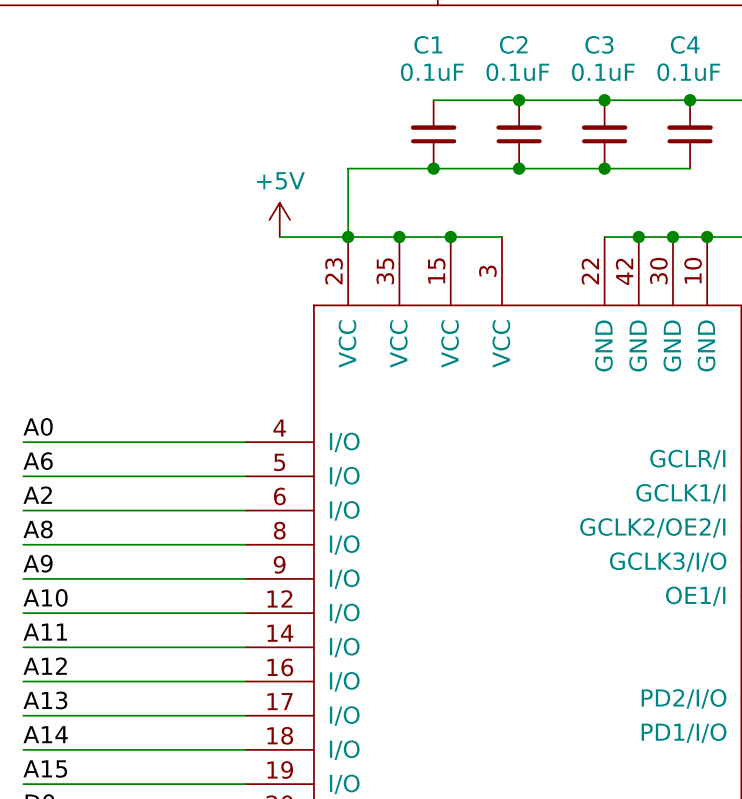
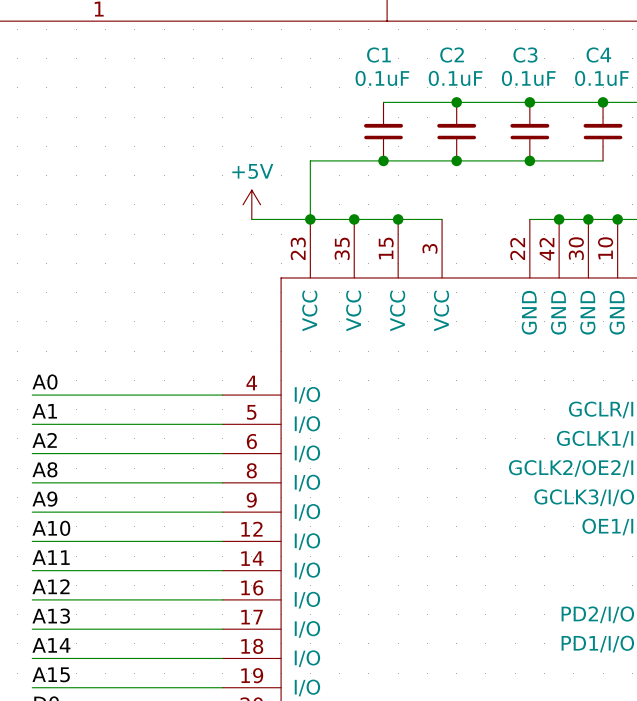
label: A6 (38, 461) -> A1 (44, 411)

